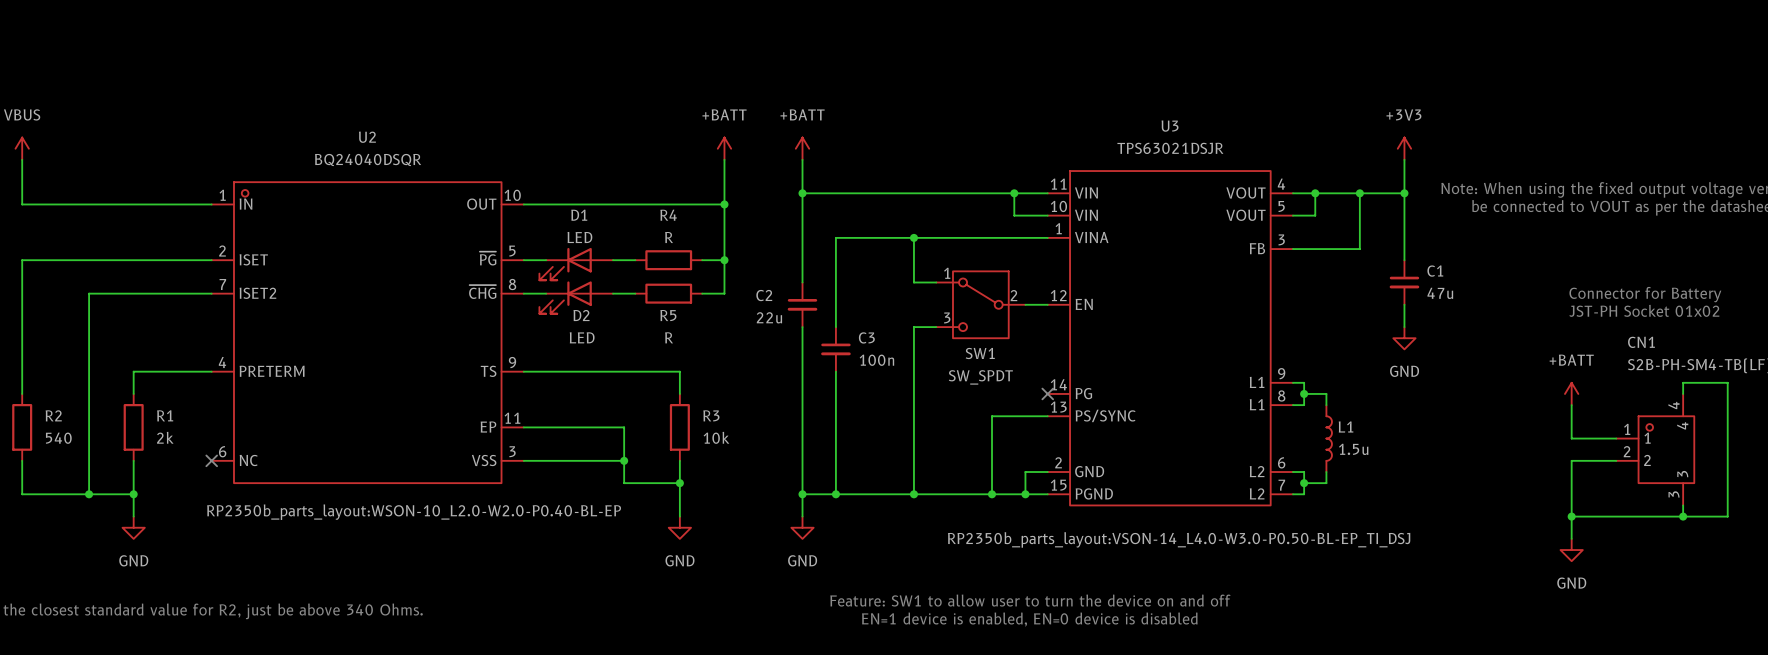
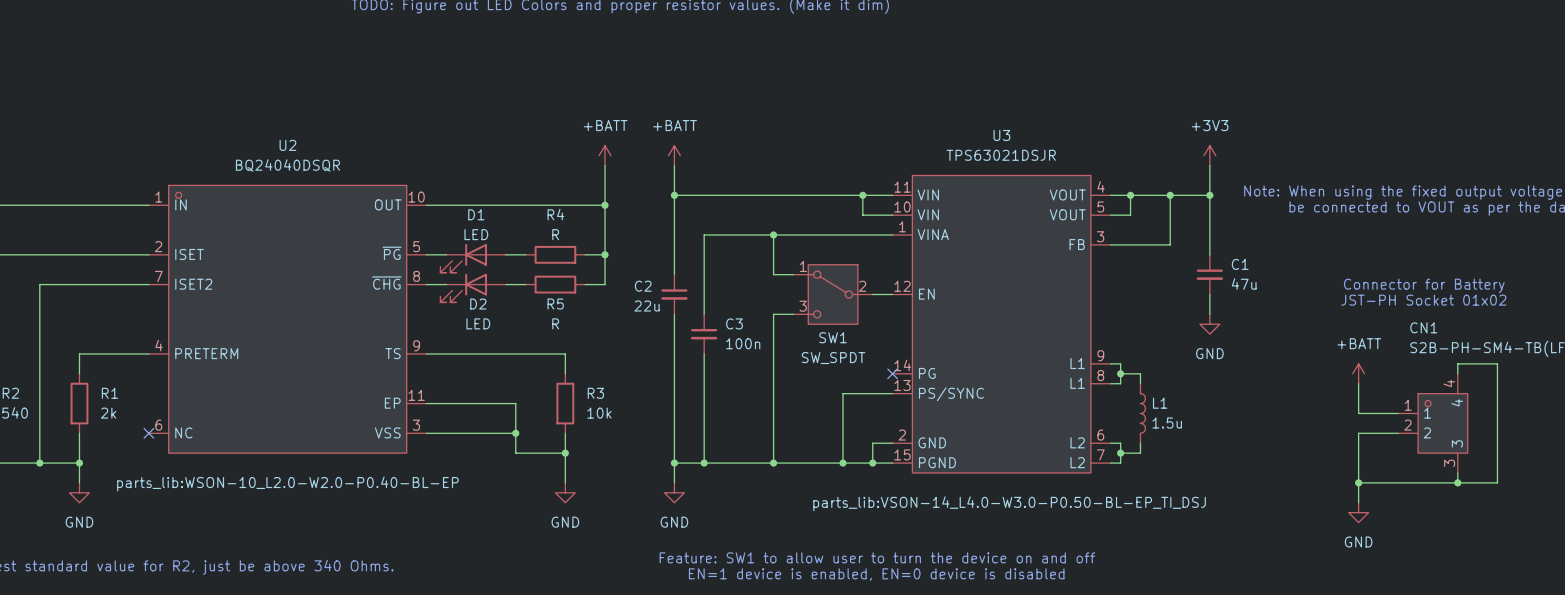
U2 text: RP2350b_parts_layout:WSON-10_L2.0-W2.0-P0.40-BL-EP (414, 512) -> parts_lib:WSON-10_L2.0-W2.0-P0.40-BL-EP (287, 483)
U3 text: RP2350b_parts_layout:VSON-14_L4.0-W3.0-P0.50-BL-EP_TI_DSJ (1179, 539) -> parts_lib:VSON-14_L4.0-W3.0-P0.50-BL-EP_TI_DSJ (1009, 503)

